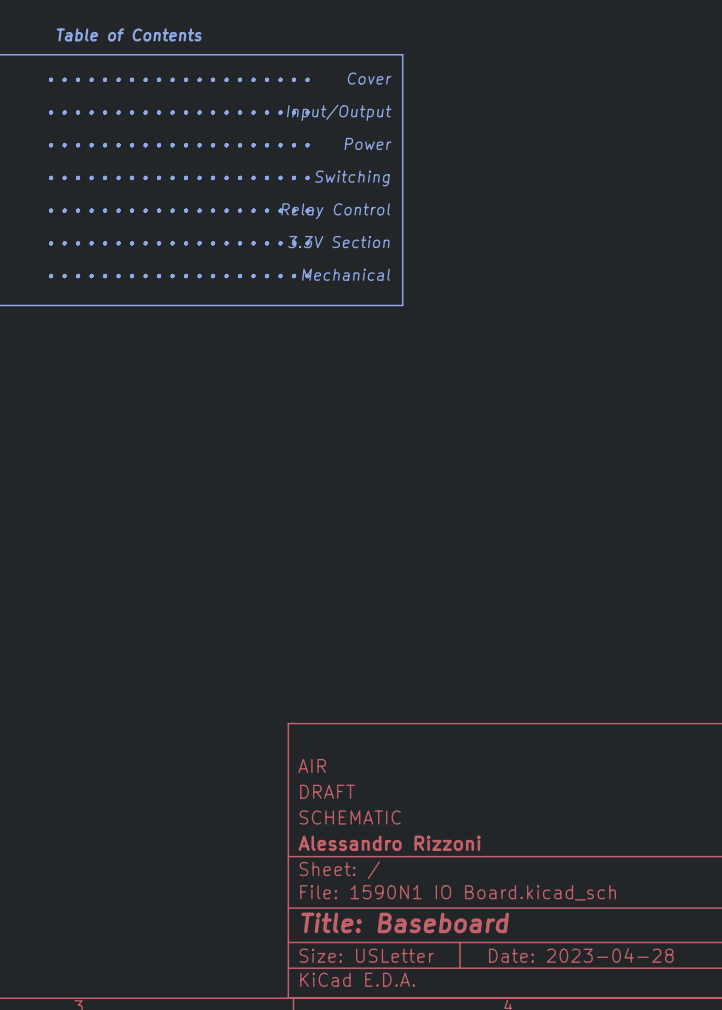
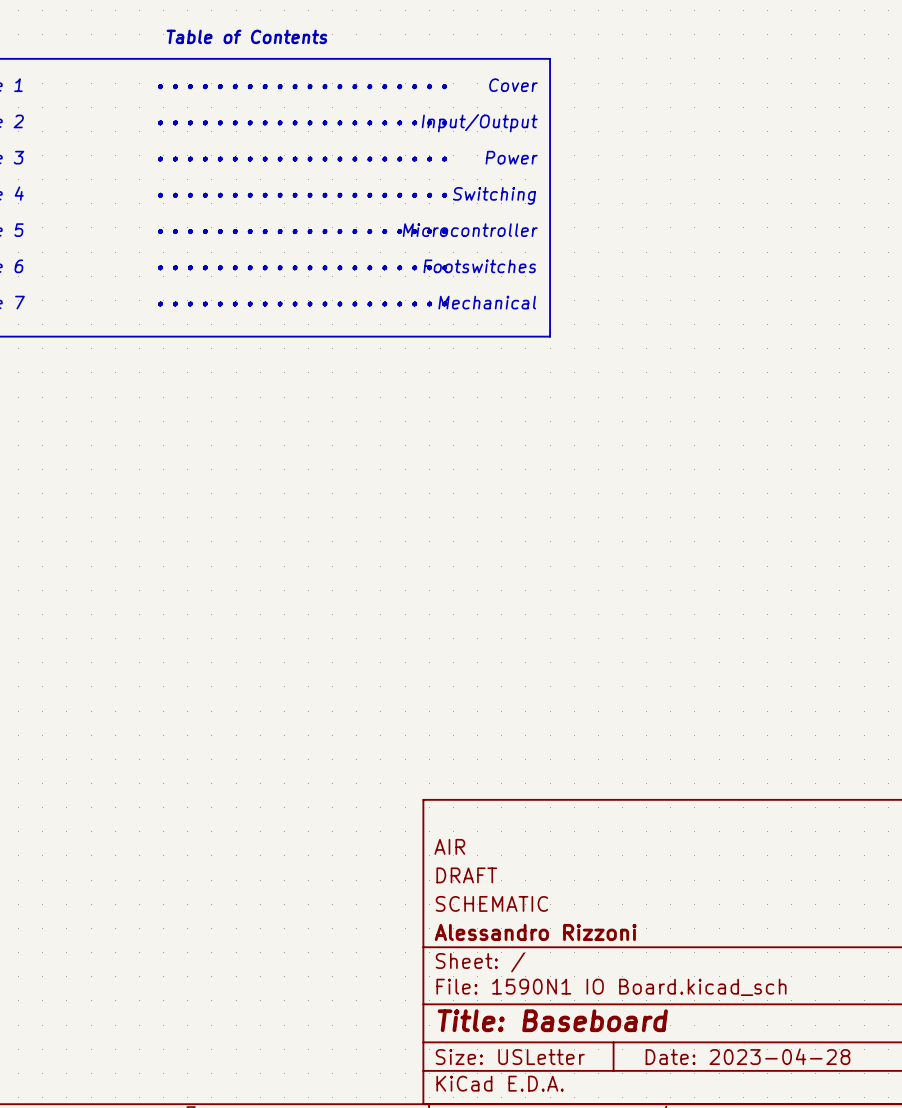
text: Relay Control (335, 211) -> Microcontroller (470, 230)
text: 3.3V Section (338, 242) -> Footswitches (479, 266)

